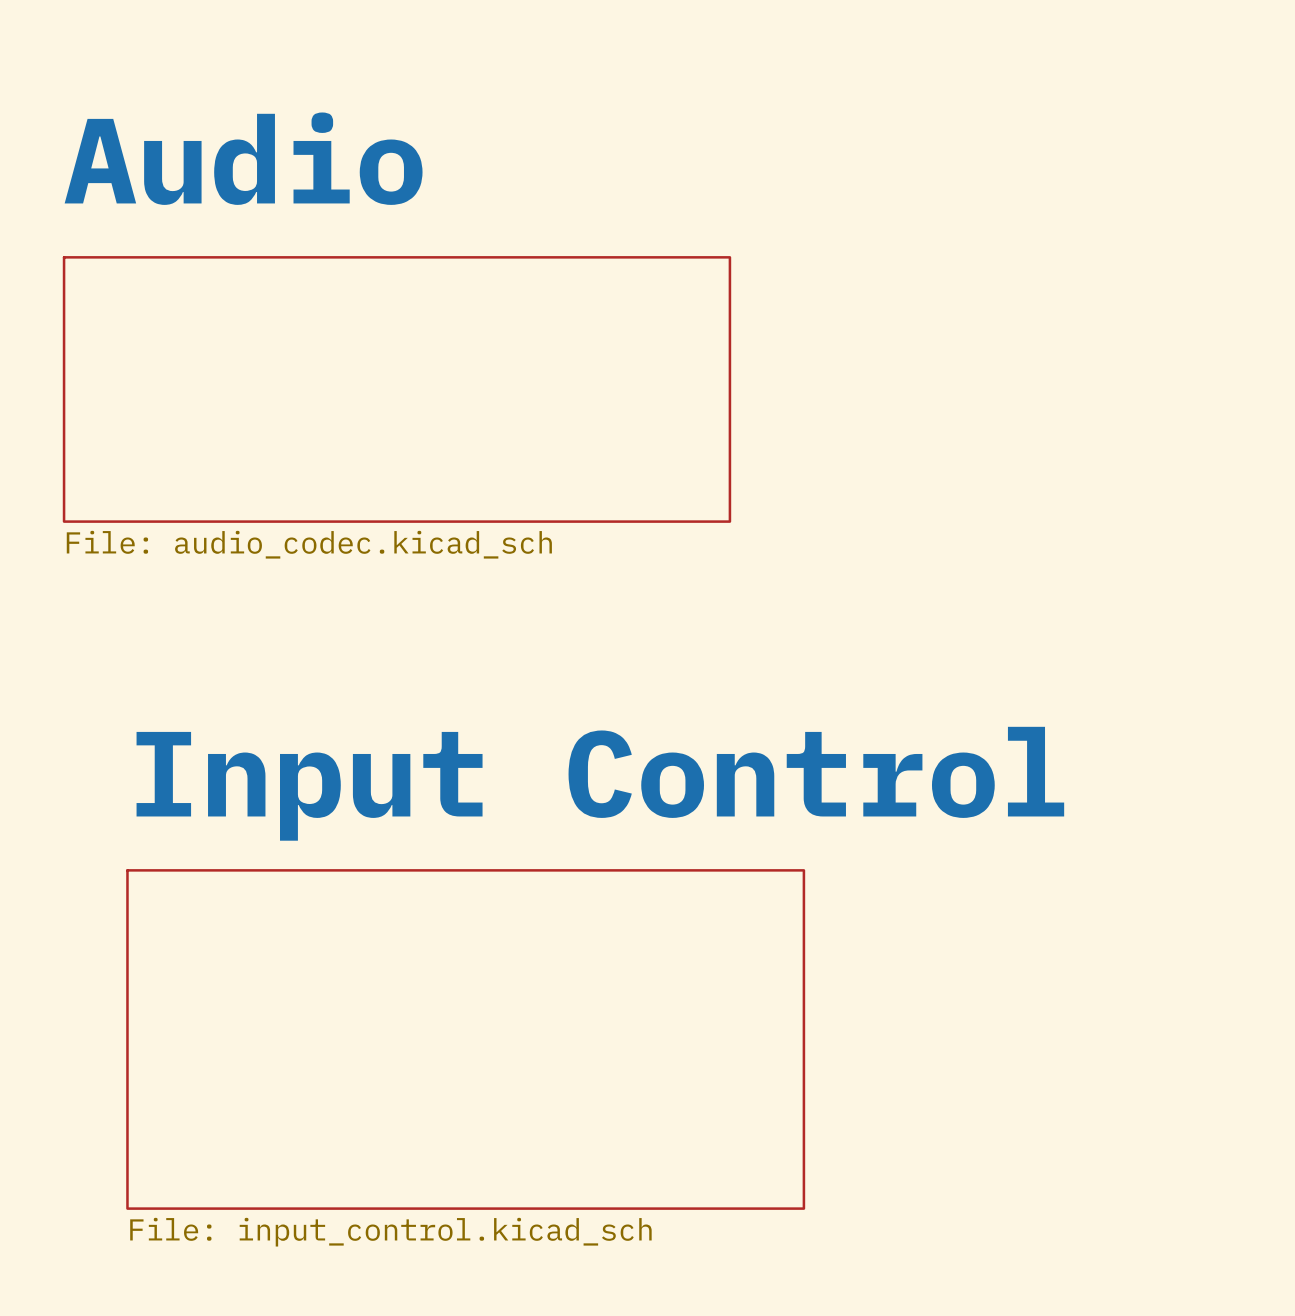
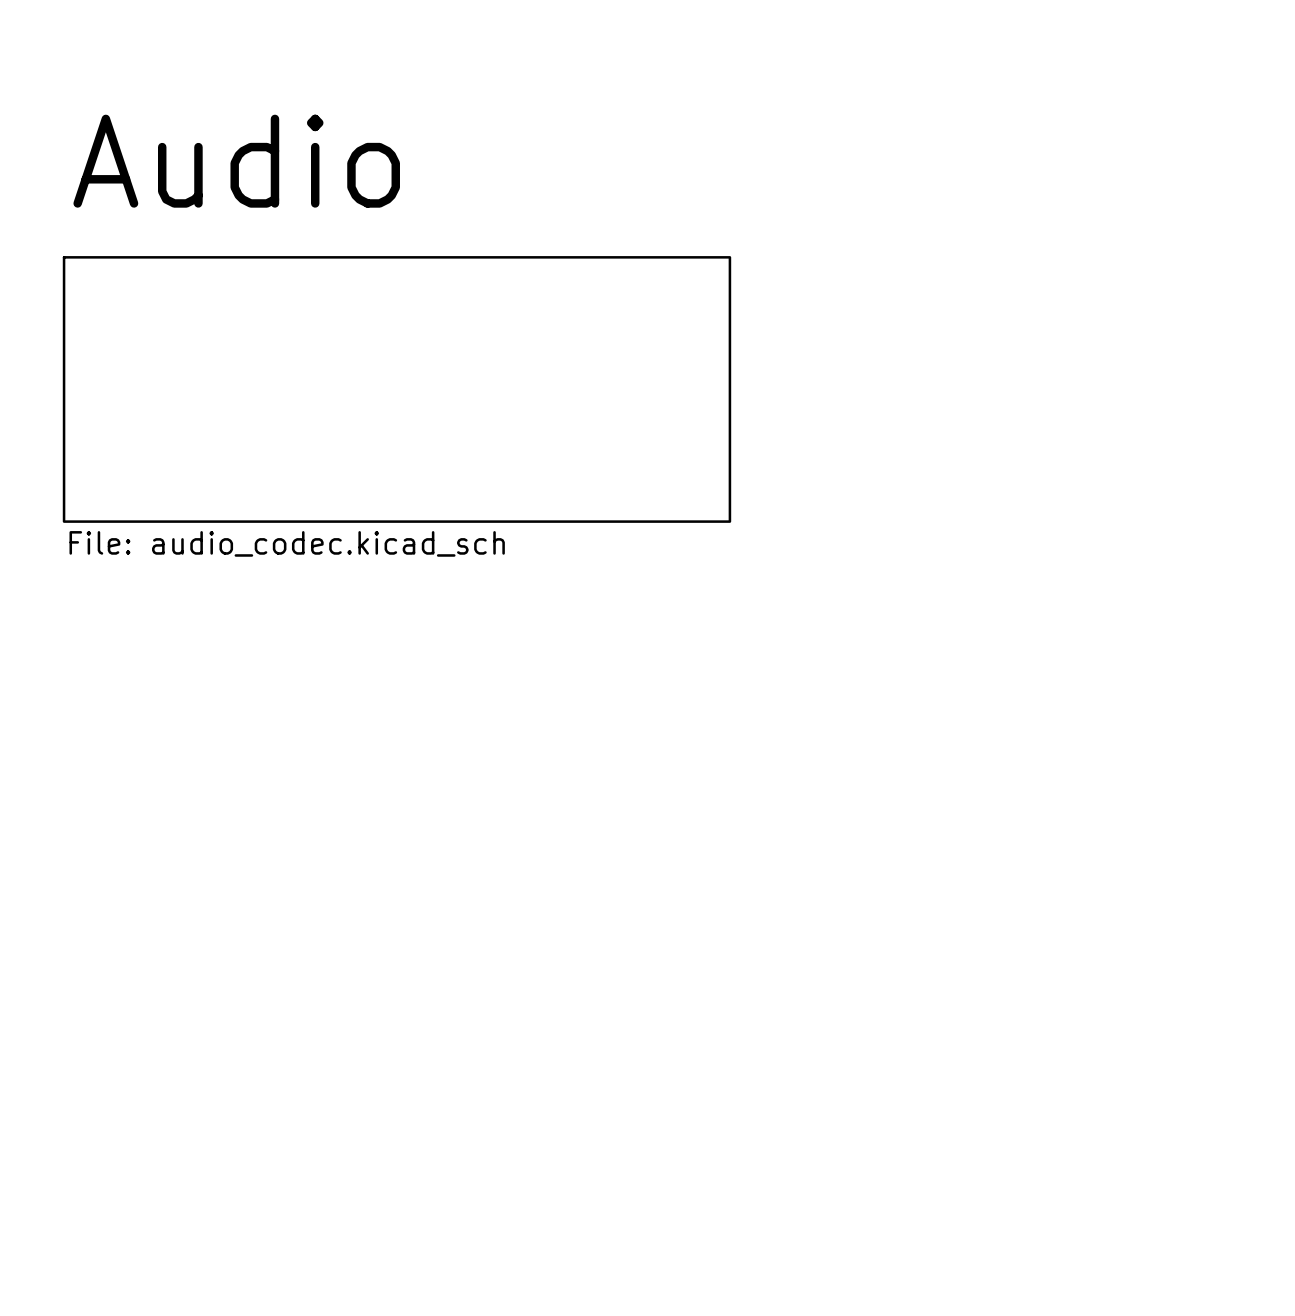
sheet Input Control: File: input_control.kicad_sch (465, 1039) -> none

